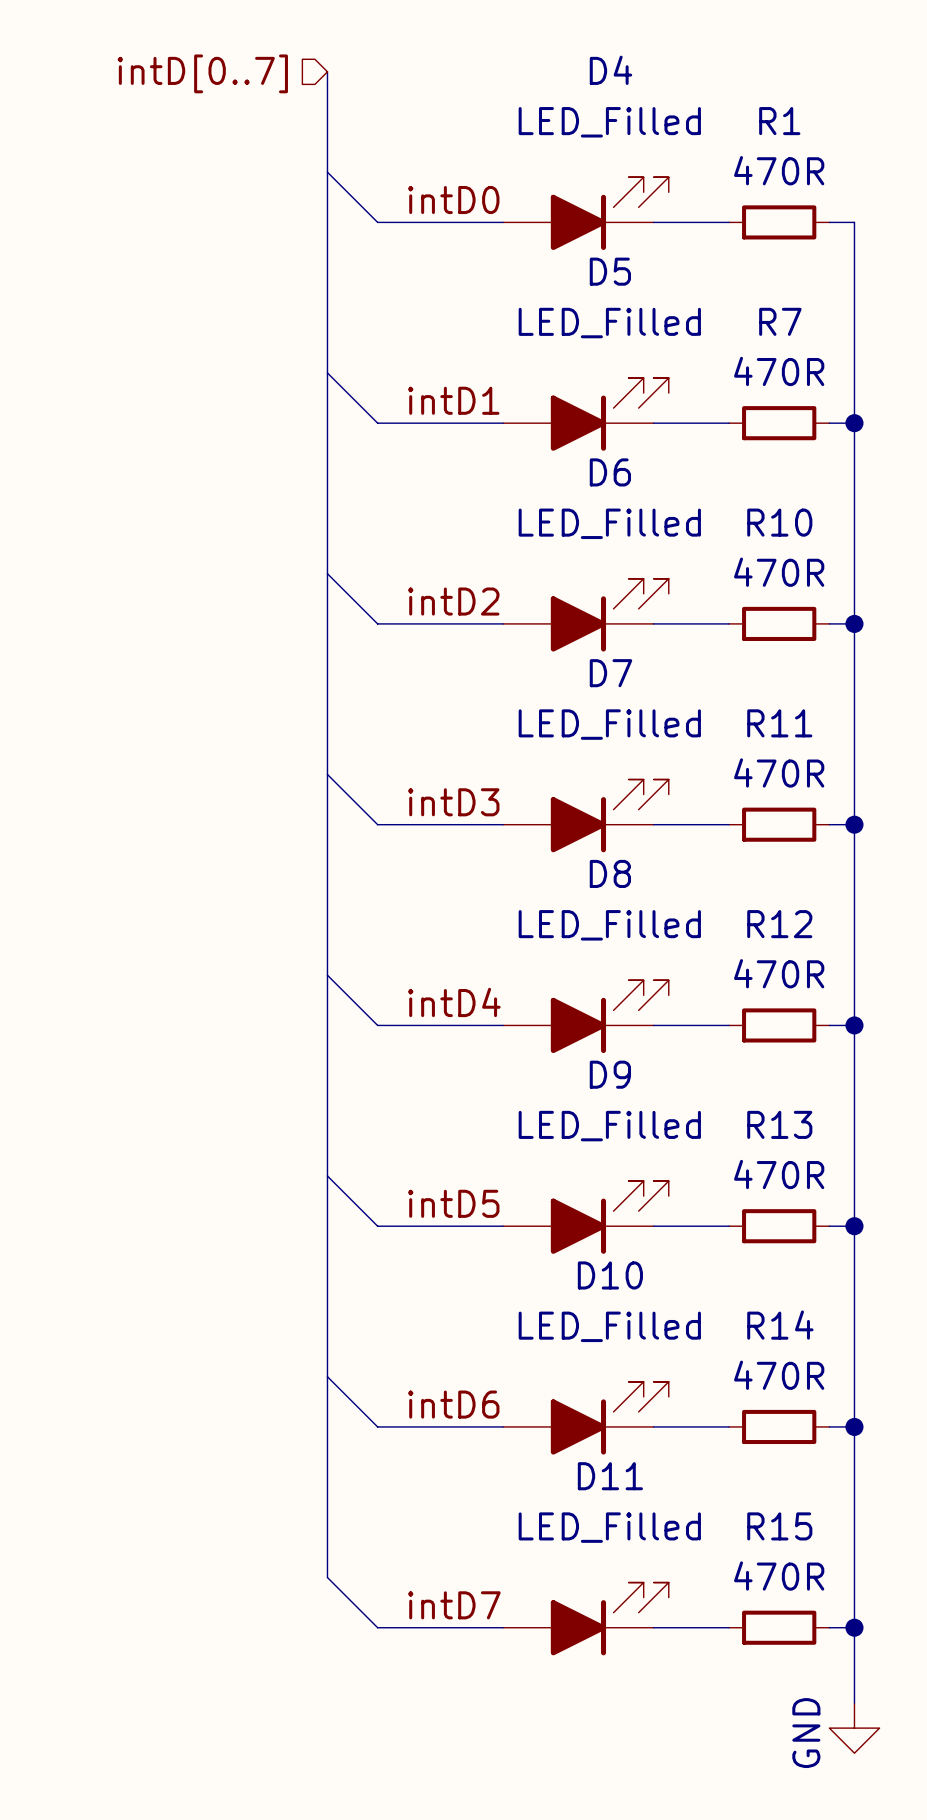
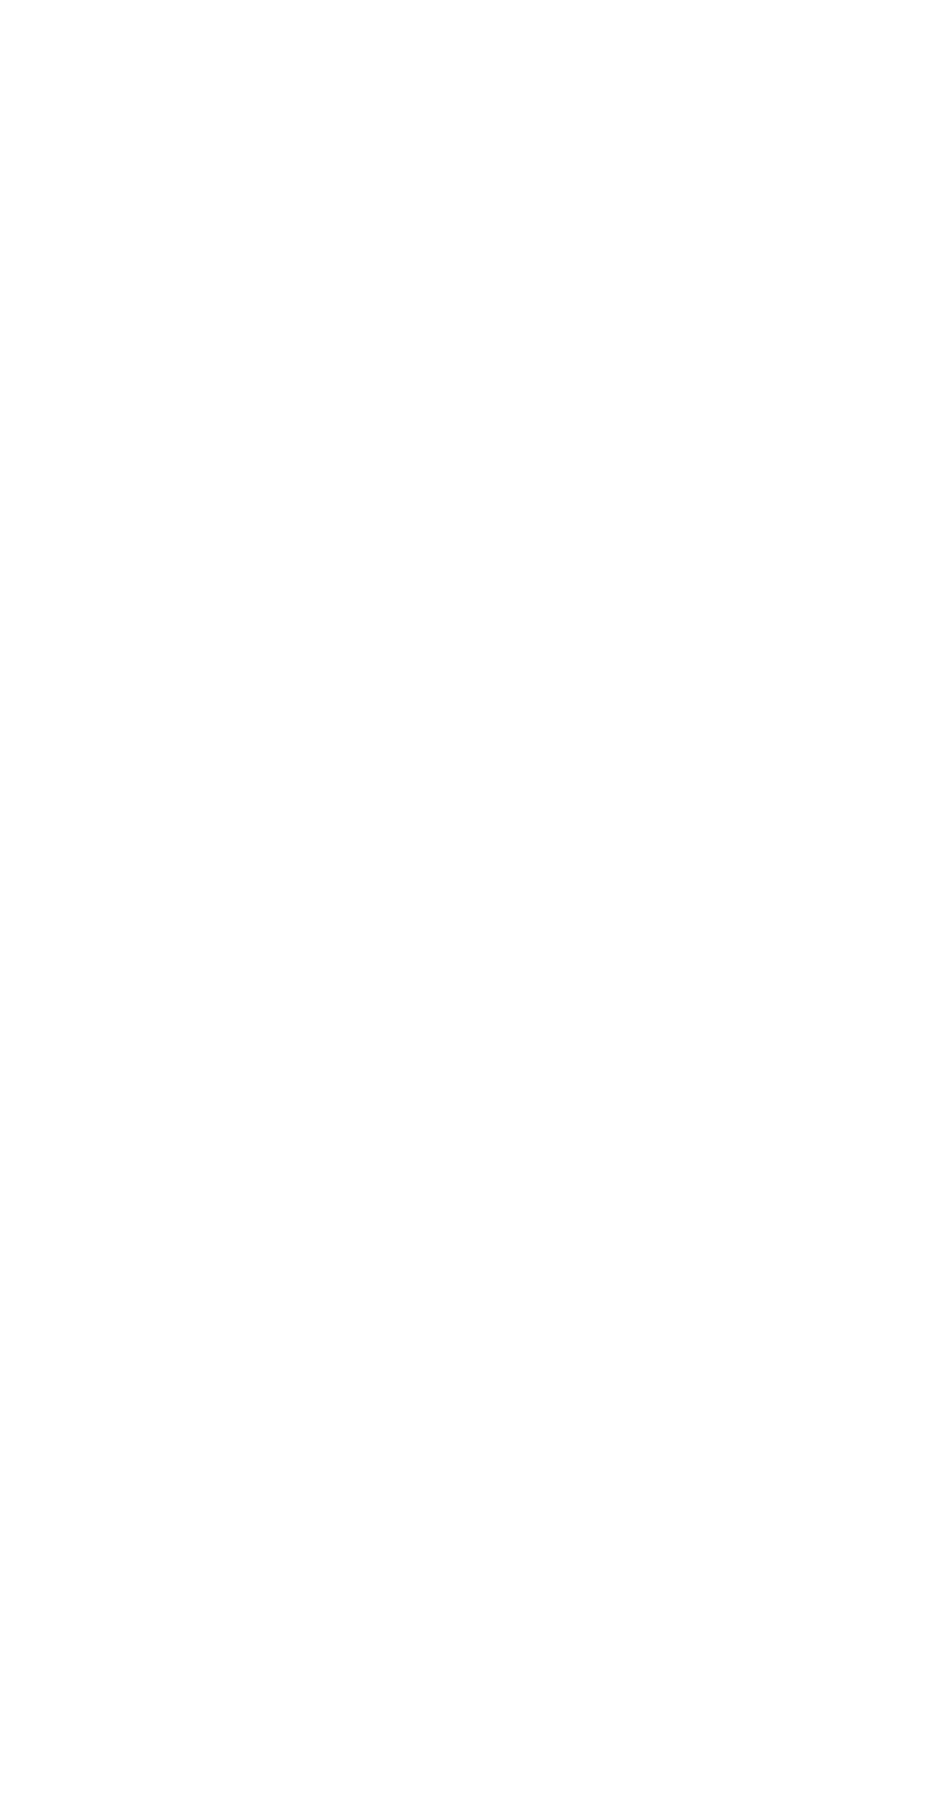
bus: (327, 71) (327, 1577) -> none
hierarchical label: intD[0..7] (202, 73) -> none
wire: (327, 172) (377, 222) (503, 222) -> none
label: intD0 (453, 200) -> none
D4: LED_Filled (585, 213) -> none
wire: (653, 222) (728, 222) -> none
R1: 470R (779, 222) -> none
wire: (829, 222) (854, 222) (854, 1703) -> none
wire: (327, 372) (377, 423) (503, 423) -> none
label: intD1 (453, 400) -> none
D5: LED_Filled (585, 414) -> none
wire: (653, 423) (728, 423) -> none
R7: 470R (779, 423) -> none
wire: (829, 423) (854, 423) -> none
junction: (854, 423) -> none
wire: (327, 573) (377, 623) (503, 623) -> none
label: intD2 (453, 601) -> none
D6: LED_Filled (585, 615) -> none
wire: (653, 623) (728, 623) -> none
R10: 470R (779, 623) -> none
wire: (829, 623) (854, 623) -> none
junction: (854, 623) -> none
wire: (327, 774) (377, 824) (503, 824) -> none
label: intD3 (453, 802) -> none
D7: LED_Filled (585, 815) -> none
wire: (653, 824) (728, 824) -> none
R11: 470R (779, 824) -> none
wire: (829, 824) (854, 824) -> none
junction: (854, 824) -> none
wire: (327, 975) (377, 1025) (503, 1025) -> none
label: intD4 (454, 1002) -> none
D8: LED_Filled (585, 1016) -> none
wire: (653, 1025) (728, 1025) -> none
R12: 470R (779, 1025) -> none
wire: (829, 1025) (854, 1025) -> none
junction: (854, 1025) -> none
wire: (327, 1176) (377, 1226) (503, 1226) -> none
label: intD5 (453, 1203) -> none
D9: LED_Filled (585, 1217) -> none
wire: (653, 1226) (728, 1226) -> none
R13: 470R (779, 1226) -> none
wire: (829, 1226) (854, 1226) -> none
junction: (854, 1226) -> none
wire: (327, 1376) (377, 1426) (503, 1426) -> none
label: intD6 (453, 1404) -> none
D10: LED_Filled (585, 1418) -> none
wire: (653, 1426) (728, 1426) -> none
R14: 470R (779, 1426) -> none
wire: (829, 1426) (854, 1426) -> none
junction: (854, 1426) -> none
wire: (327, 1577) (377, 1627) (503, 1627) -> none
label: intD7 (454, 1605) -> none
D11: LED_Filled (585, 1618) -> none
wire: (653, 1627) (728, 1627) -> none
R15: 470R (779, 1627) -> none
wire: (829, 1627) (854, 1627) -> none
junction: (854, 1627) -> none
power symbol: GND (854, 1728) -> none

